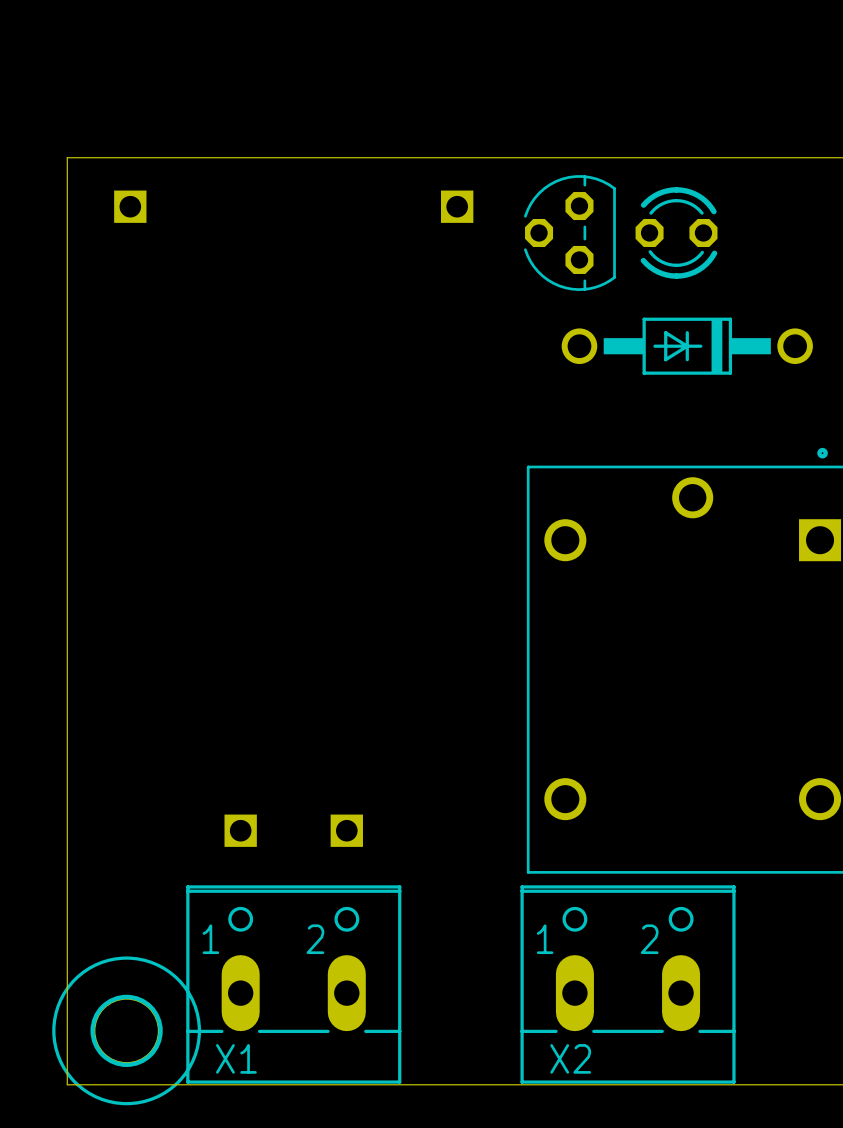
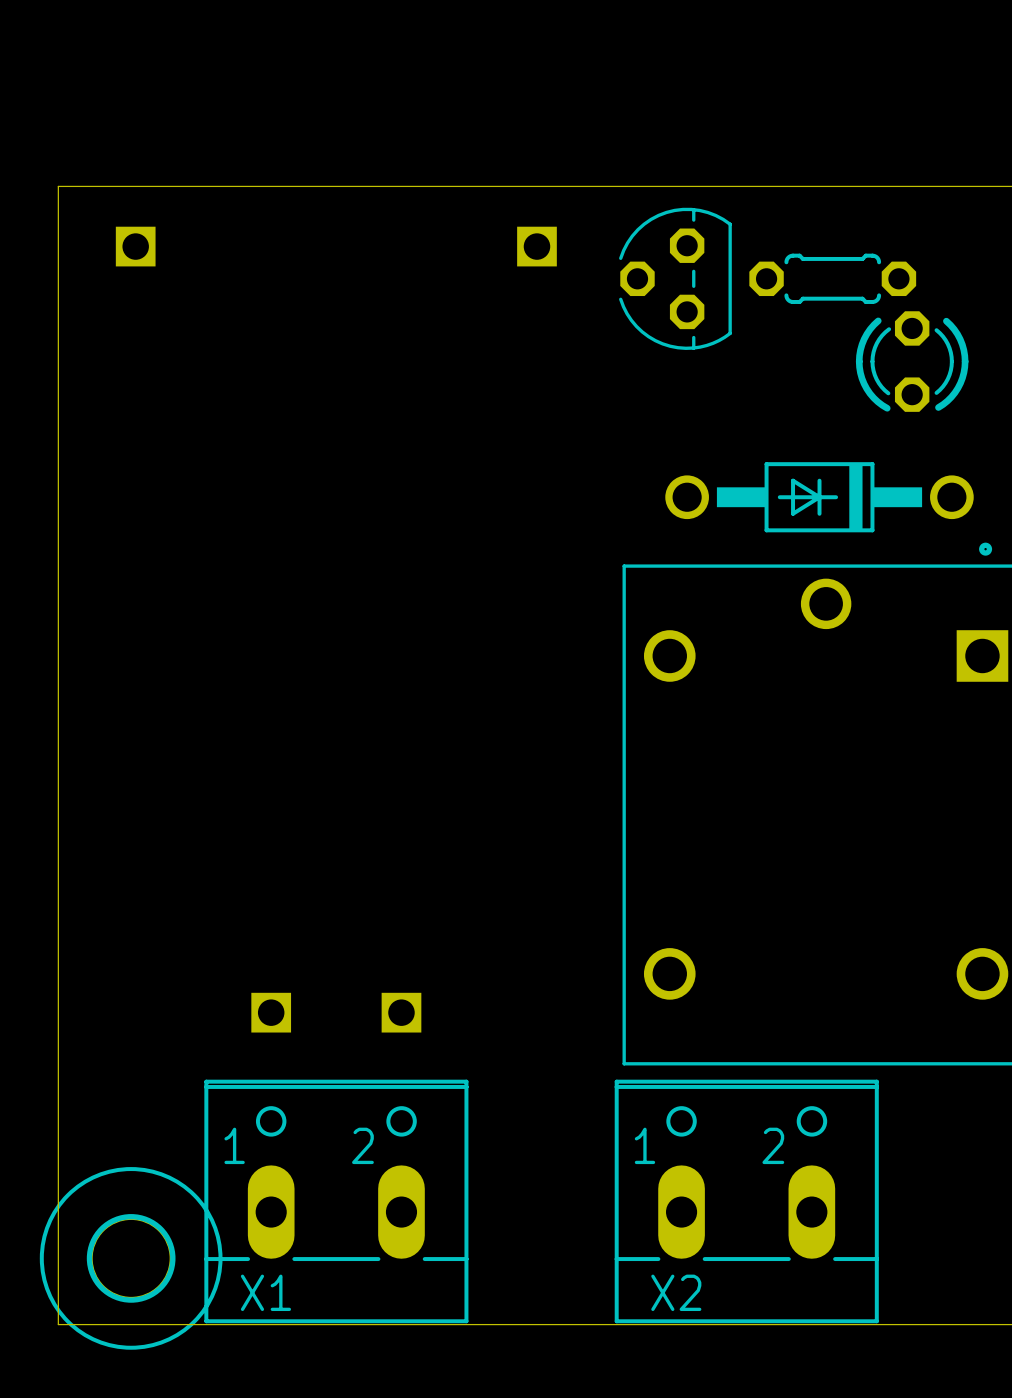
part rotation: 0° (676, 232) -> 90° clockwise (912, 361)
part position: (676, 232) -> (912, 361)
part: none -> (832, 278)
part position: (687, 346) -> (819, 497)

